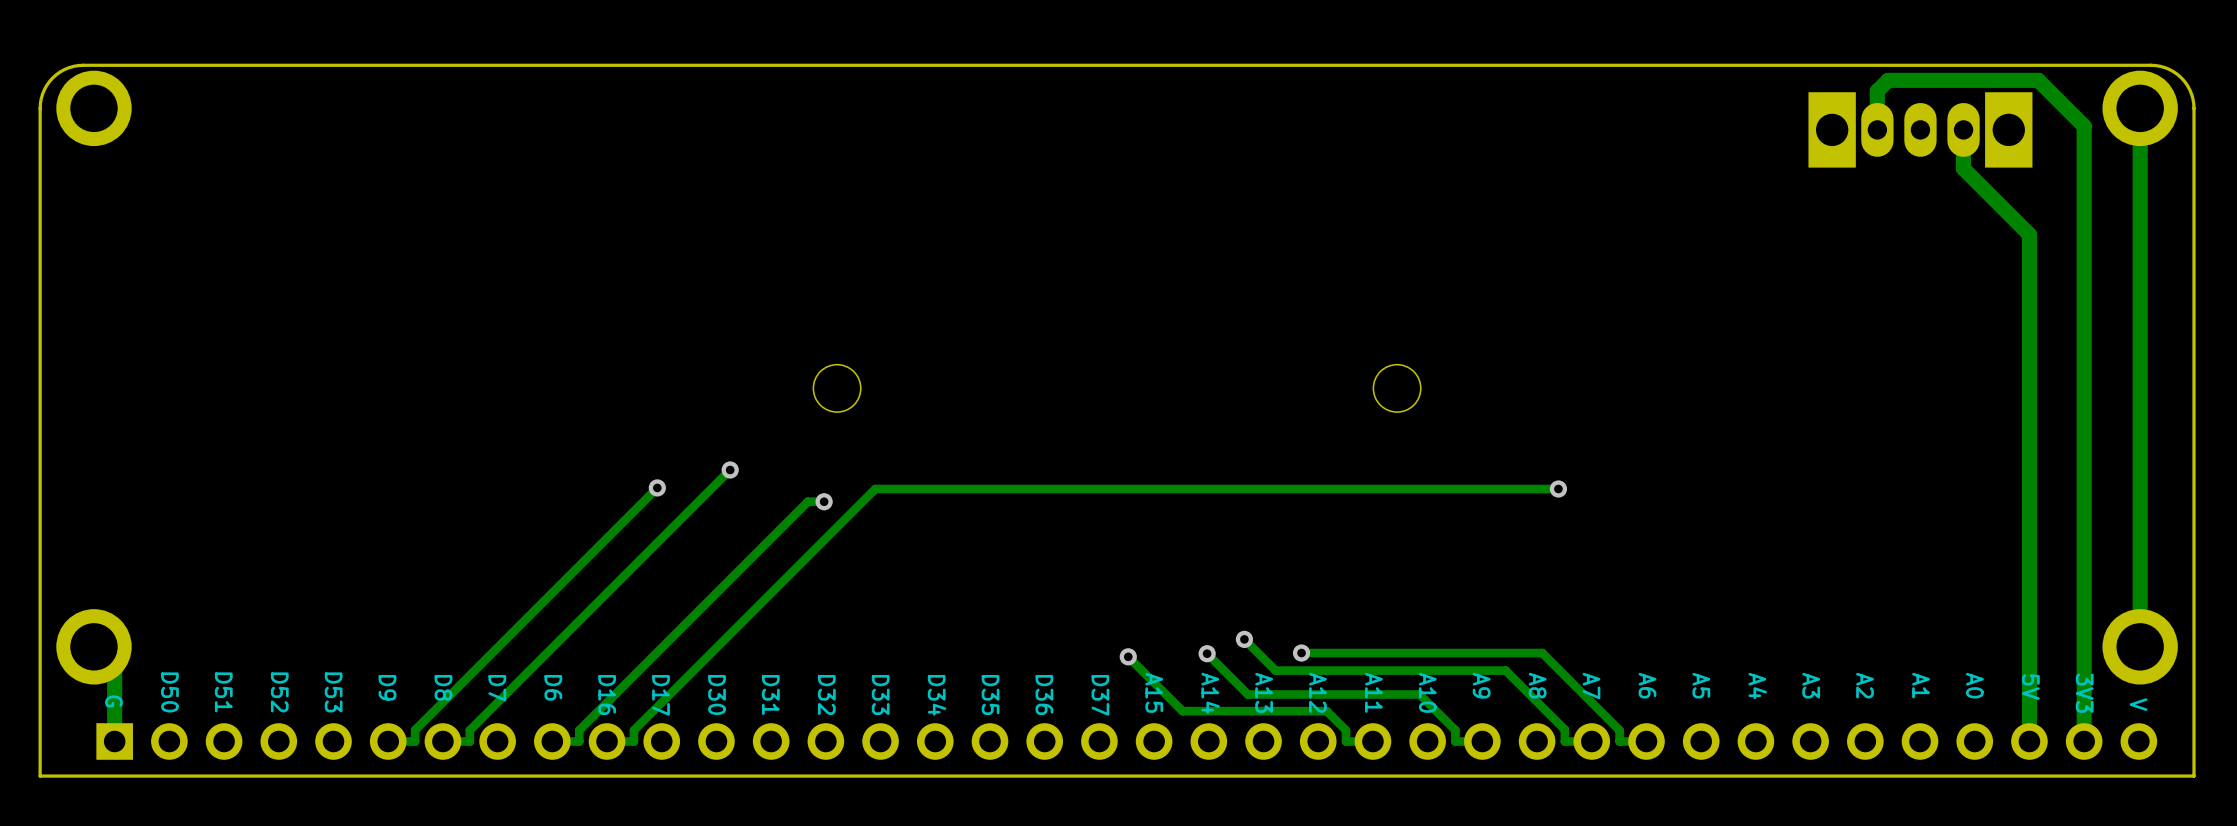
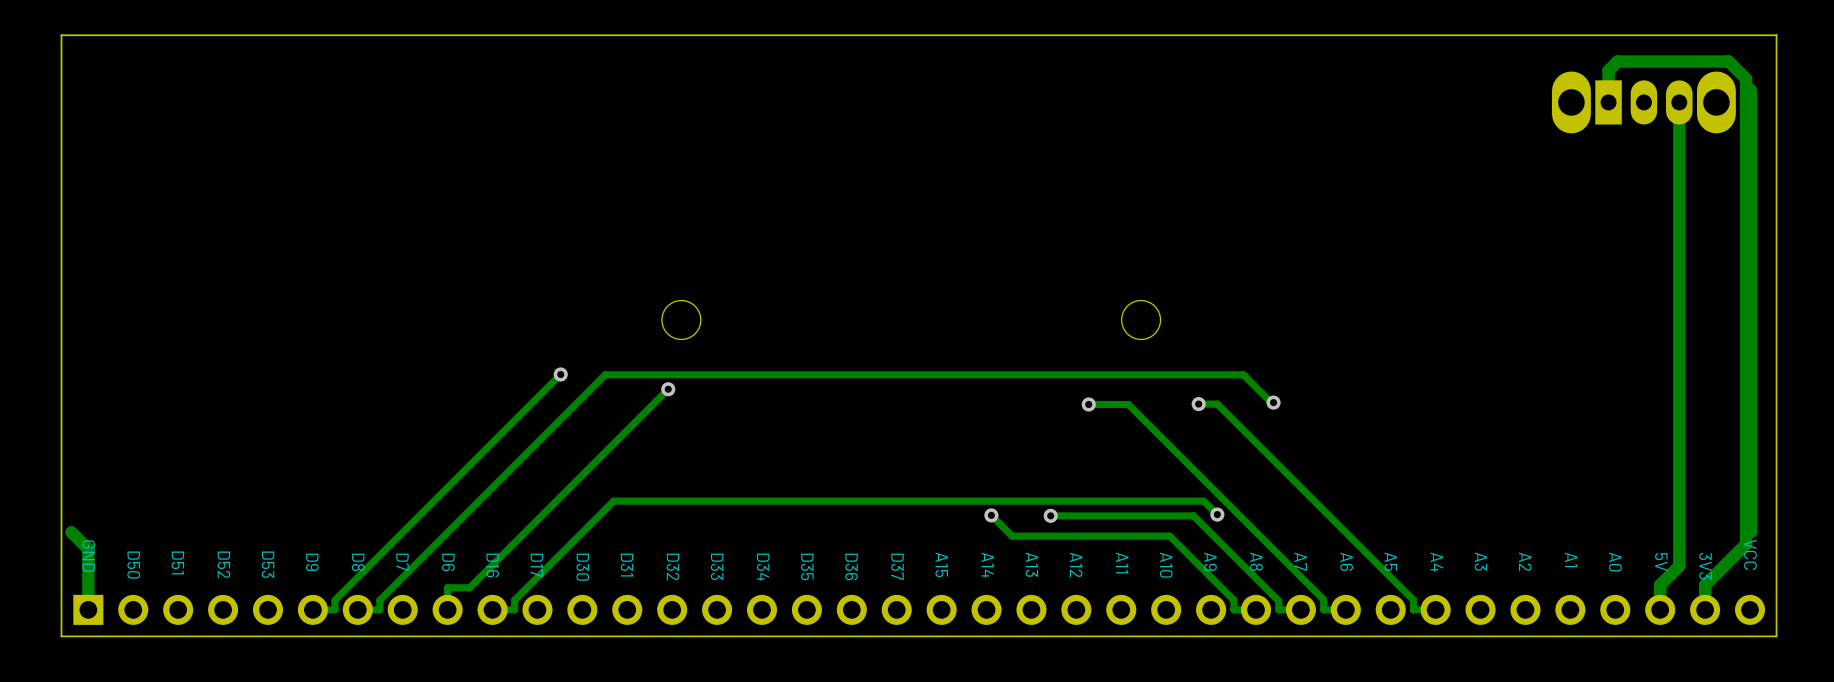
board edge: (2150, 65) (83, 65) (68, 67) (56, 74) (49, 81) (42, 94) (40, 108) (40, 776) (2194, 776) (2193, 103) (2189, 89) (2177, 74) (2165, 67) (2150, 65) -> (1776, 35) (1776, 636) (61, 636) (61, 35) (1776, 35)
part: (93, 108) -> none
part: (2140, 108) -> none
part: none -> (1643, 102)
track: (1877, 129) (1877, 91) (1888, 80) (2038, 80) (2084, 126) (2084, 711) -> (1608, 102) (1608, 70) (1617, 61) (1728, 61) (1746, 78) (1746, 544) (1705, 585)
part: (1920, 129) -> none
track: (1963, 129) (1963, 168) (2029, 234) (2029, 711) -> (1679, 102) (1679, 566) (1660, 585)
via: none -> (560, 374)
track: (730, 469) (469, 730) -> (1273, 404) (1243, 374) (605, 374) (379, 600)
via: (730, 469) -> none
track: (657, 487) (415, 730) -> (560, 374) (335, 600)
via: (657, 487) -> none
track: (1558, 489) (875, 489) (633, 730) -> (1217, 514) (1203, 501) (613, 501) (514, 600)
track: none -> (1198, 404) (1217, 404) (1413, 600) (1413, 609) (1435, 609)
via: none -> (1198, 404)
via: none -> (1088, 404)
track: (824, 501) (807, 501) (579, 730) (579, 741) (552, 741) -> (668, 389) (469, 587) (447, 587) (447, 609)
via position: (824, 501) -> (668, 389)
via: none -> (1217, 514)
track: none -> (991, 515) (1012, 536) (1169, 536) (1233, 600) (1233, 609) (1256, 609)
via: none -> (991, 515)
via: none -> (1050, 515)
track: (1244, 639) (1275, 670) (1505, 670) (1564, 730) -> (1050, 515) (1193, 515) (1278, 601)
via: (1244, 639) -> none
part: (93, 646) -> none
part: (2140, 646) -> none
track: (1207, 653) (1247, 694) (1419, 694) (1455, 730) (1455, 741) (1482, 741) -> none
via: (1207, 653) -> none
track: (1301, 653) (1542, 653) (1619, 730) -> (1088, 404) (1128, 404) (1323, 600)
via: (1301, 653) -> none
track: (1128, 656) (1182, 711) (1326, 711) (1346, 730) (1346, 741) (1372, 741) -> none
via: (1128, 656) -> none
text: none -> VCC (1750, 554)
text: none -> GND (88, 556)
text: G (113, 701) -> none
text: V (2138, 704) -> none

